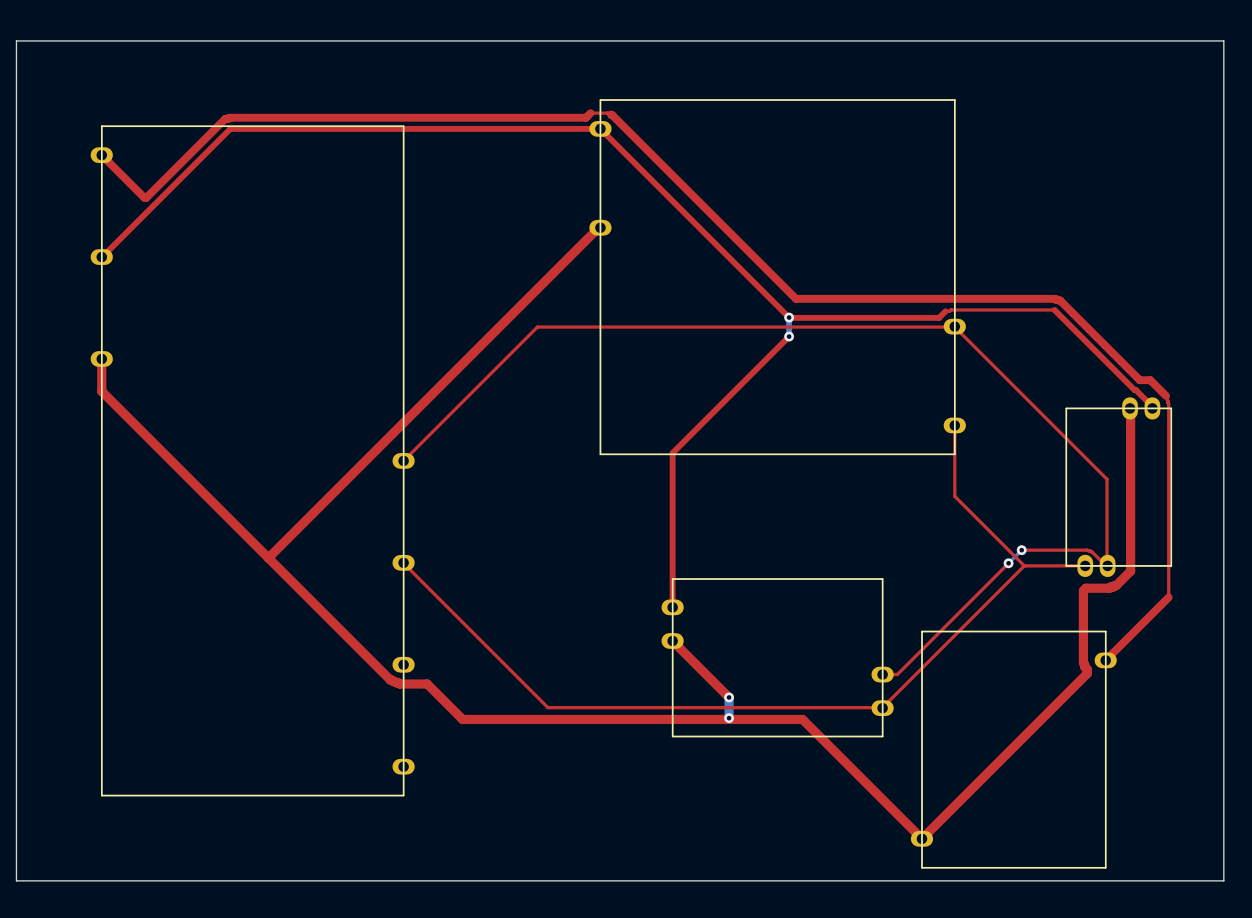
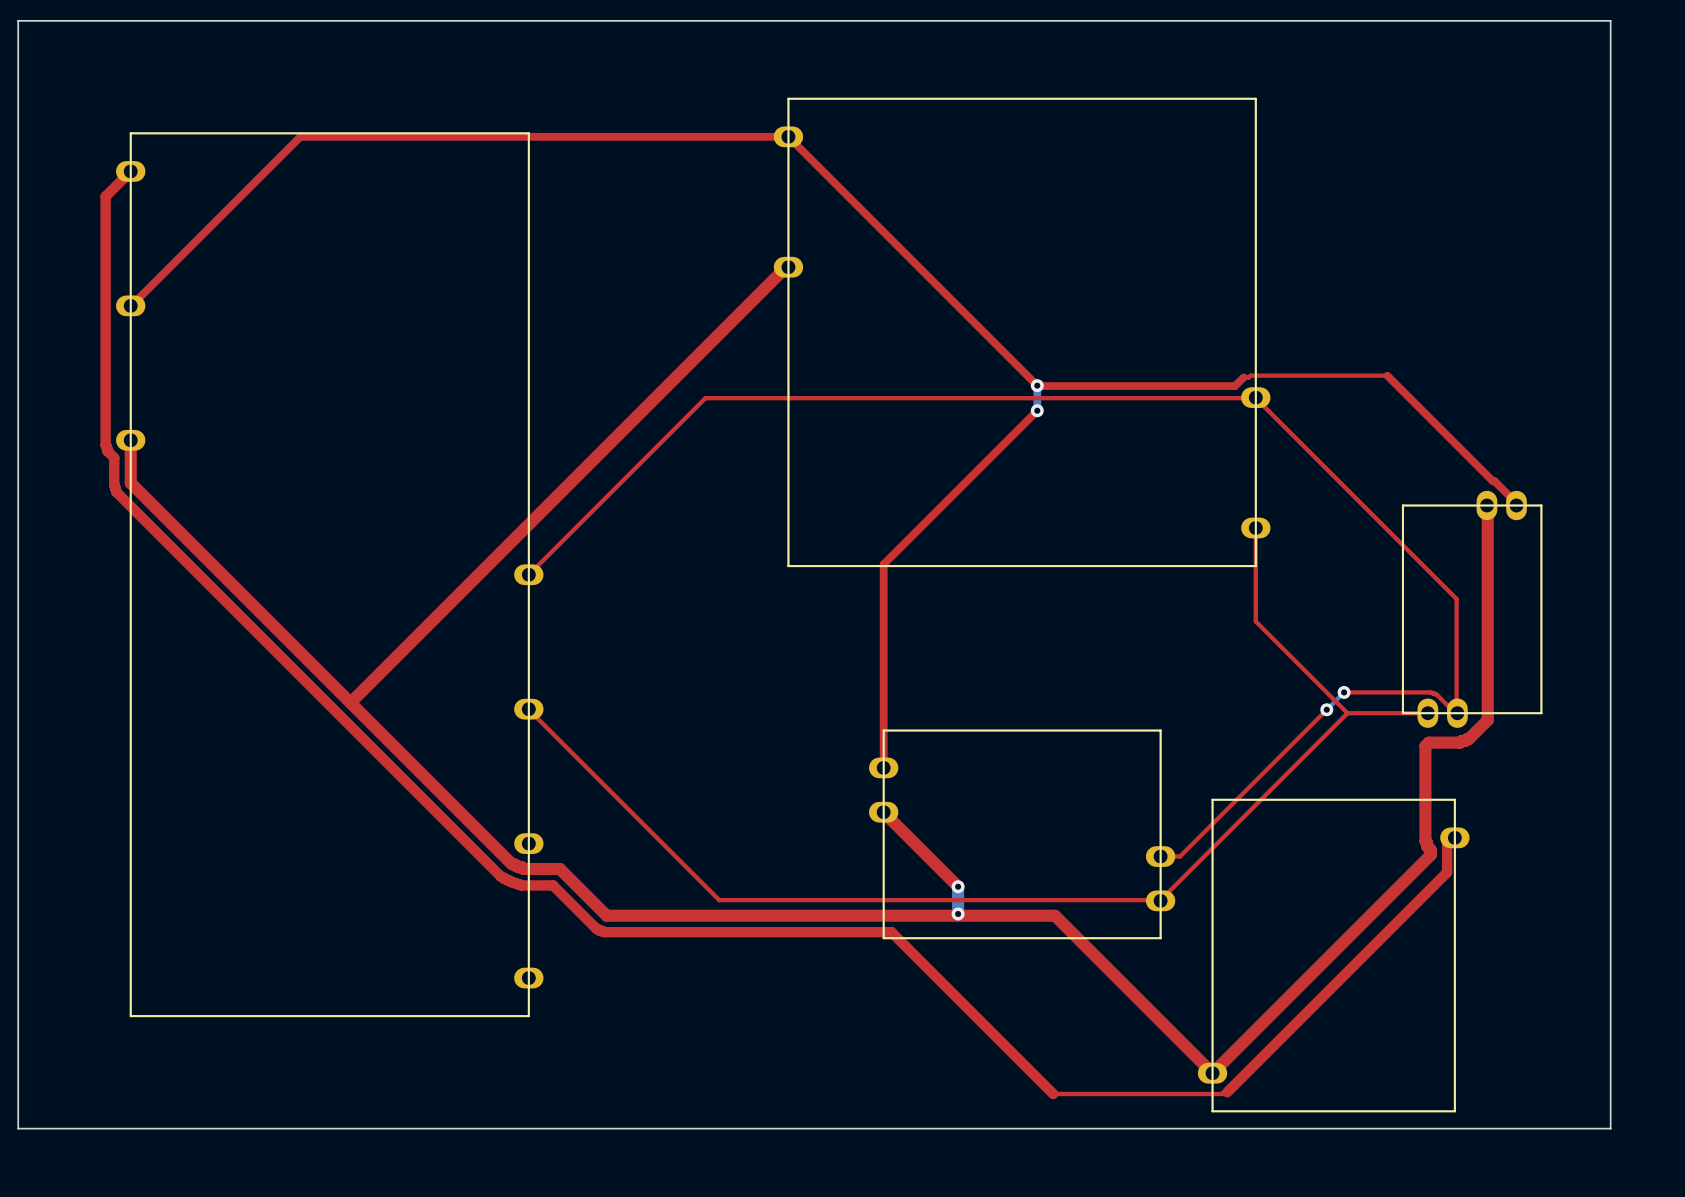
top track: (101, 155) (146, 197) (225, 119) (230, 117) (586, 117) (590, 113) (607, 113) (612, 115) (795, 298) (1054, 298) (1060, 300) (1139, 380) (1150, 380) (1166, 395) (1168, 403) (1168, 597) (1105, 660) -> (130, 171) (105, 196) (105, 444) (107, 450) (114, 457) (116, 491) (501, 876) (521, 885) (553, 885) (598, 930) (604, 932) (891, 932) (1053, 1094) (1222, 1094) (1227, 1092) (1447, 872) (1447, 845) (1454, 837)

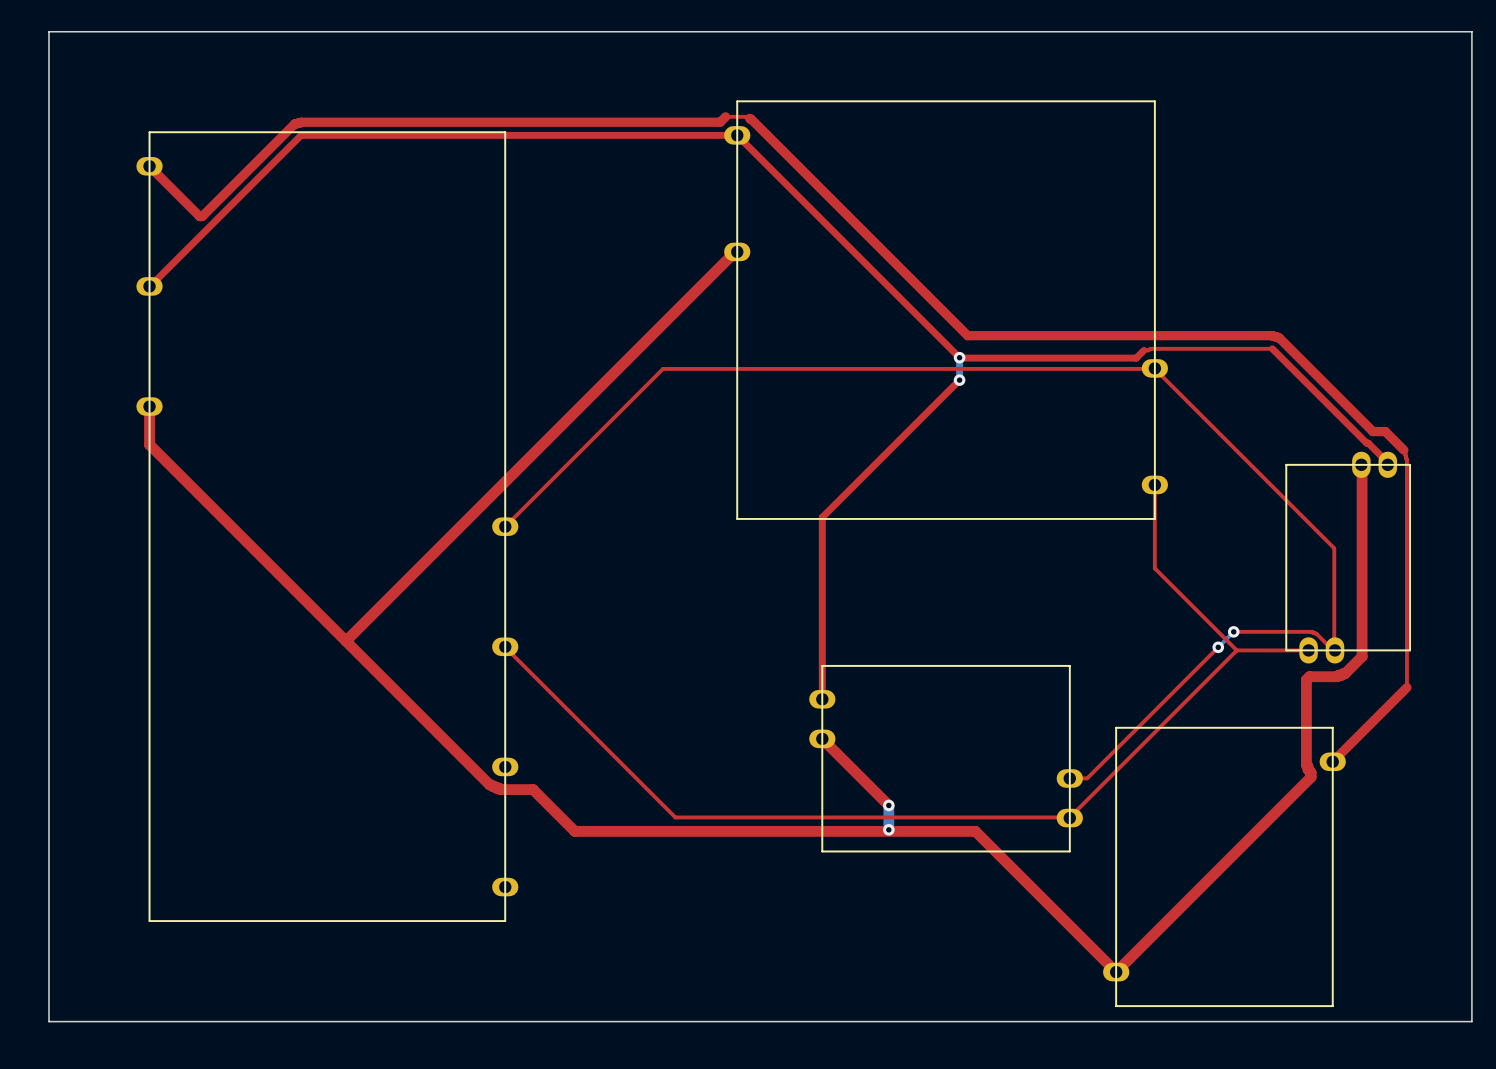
top track: (130, 171) (105, 196) (105, 444) (107, 450) (114, 457) (116, 491) (501, 876) (521, 885) (553, 885) (598, 930) (604, 932) (891, 932) (1053, 1094) (1222, 1094) (1227, 1092) (1447, 872) (1447, 845) (1454, 837) -> (149, 166) (199, 216) (202, 216) (294, 123) (301, 122) (720, 122) (725, 116) (745, 116) (751, 119) (967, 335) (1272, 335) (1279, 337) (1372, 431) (1385, 431) (1403, 450) (1406, 459) (1406, 687) (1332, 761)

